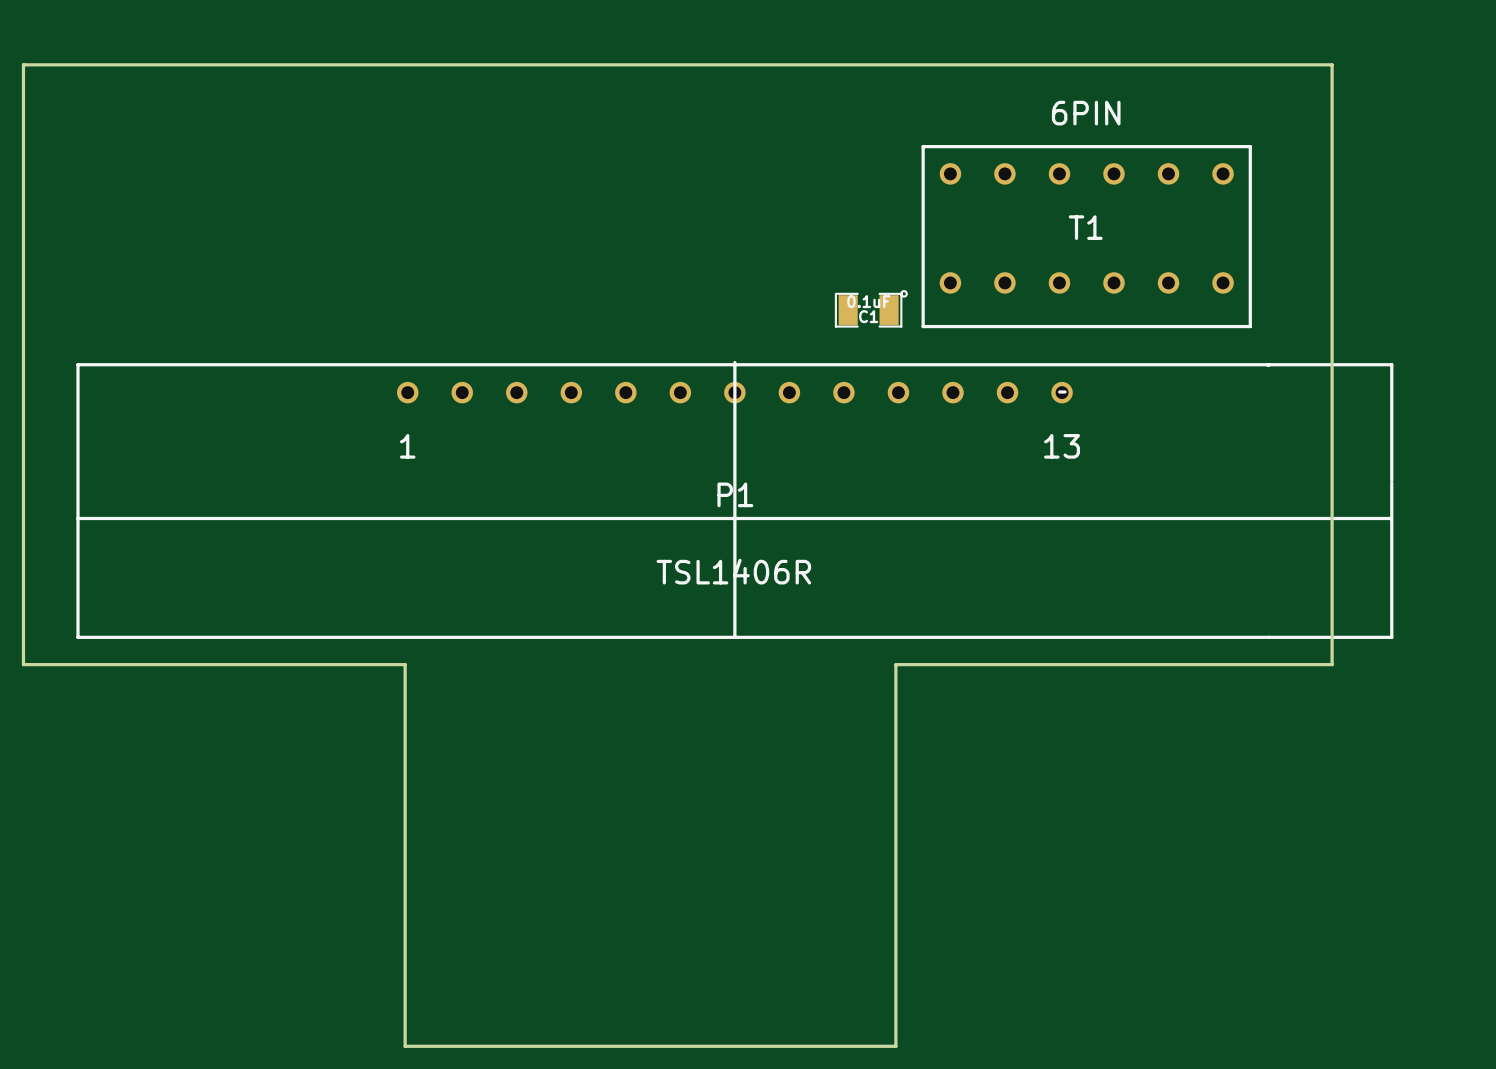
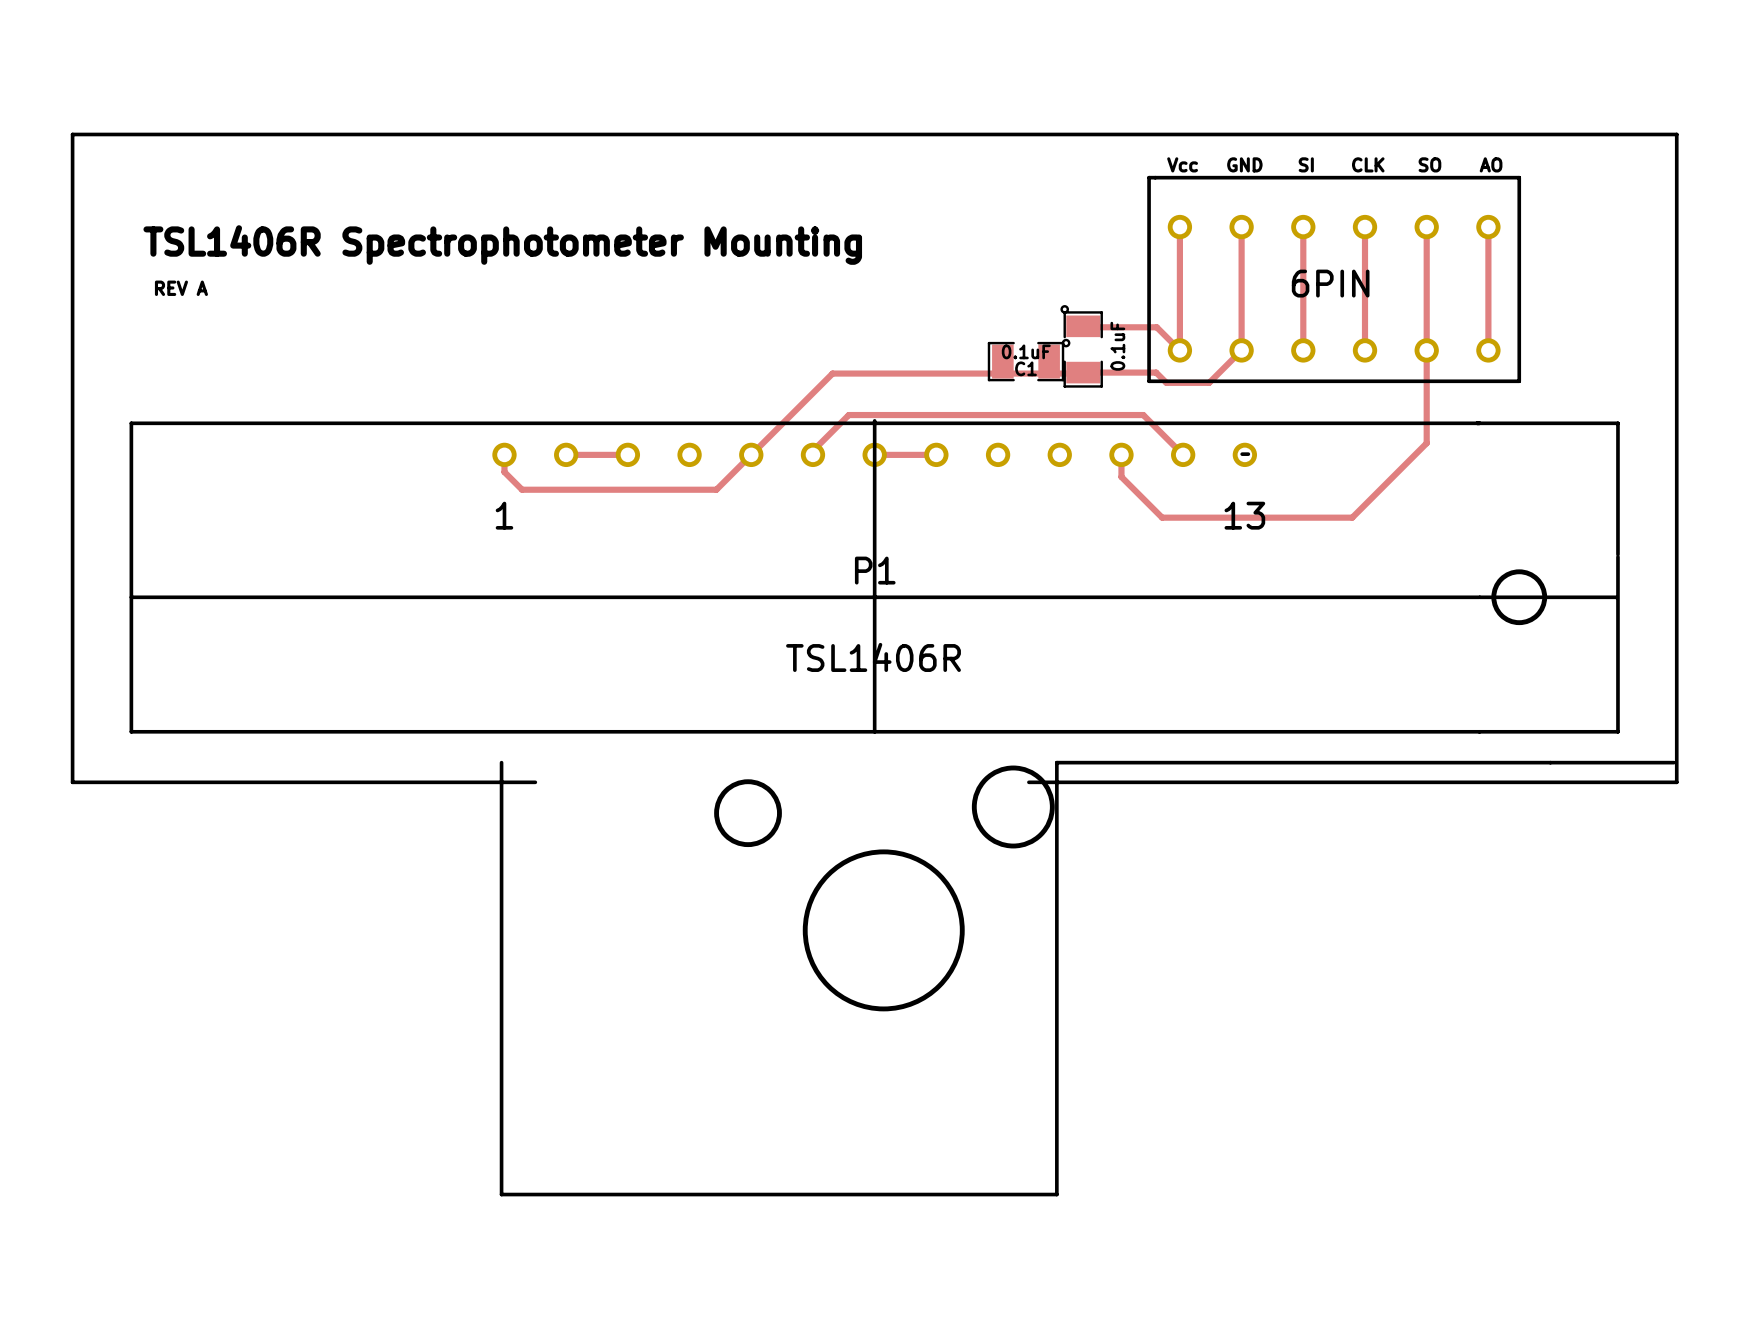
text: none -> Vcc (1182, 164)
text: none -> GND (1244, 164)
text: none -> SI (1306, 164)
text: none -> CLK (1368, 164)
text: none -> SO (1429, 164)
text: none -> AO (1491, 164)
track: none -> (1179, 227) (1179, 350) (1156, 327) (1087, 327)
track: none -> (1241, 227) (1241, 350) (1209, 382) (1166, 382) (1156, 372) (1083, 372)
track: none -> (1303, 227) (1303, 350)
track: none -> (1365, 227) (1365, 350)
track: none -> (1426, 227) (1426, 443) (1352, 517) (1162, 517) (1121, 476) (1121, 454)
track: none -> (1488, 227) (1488, 350)
text: none -> TSL1406R Spectrophotometer Mounting (502, 245)
T1: 6PIN (1086, 236) -> none
part: none -> 6PIN (1334, 279)
text: none -> REV A (181, 288)
part: none -> 0.1uF (1081, 346)
track: none -> (1087, 373) (832, 373) (716, 489) (522, 489) (504, 472) (504, 454)
track: none -> (566, 454) (627, 454)
track: none -> (812, 454) (812, 450) (848, 415) (1143, 415) (1183, 454)
track: none -> (874, 454) (936, 454)
drawing: none -> [1491, 569, 1548, 626]
board edge: (405, 664) (23, 664) (23, 64) (1332, 64) (1332, 664) -> (1673, 762) (1550, 762)
drawing: none -> [714, 765, 1055, 1012]
board edge: none -> (535, 782) (72, 782) (72, 134) (1676, 134) (1676, 782) (1028, 782)

